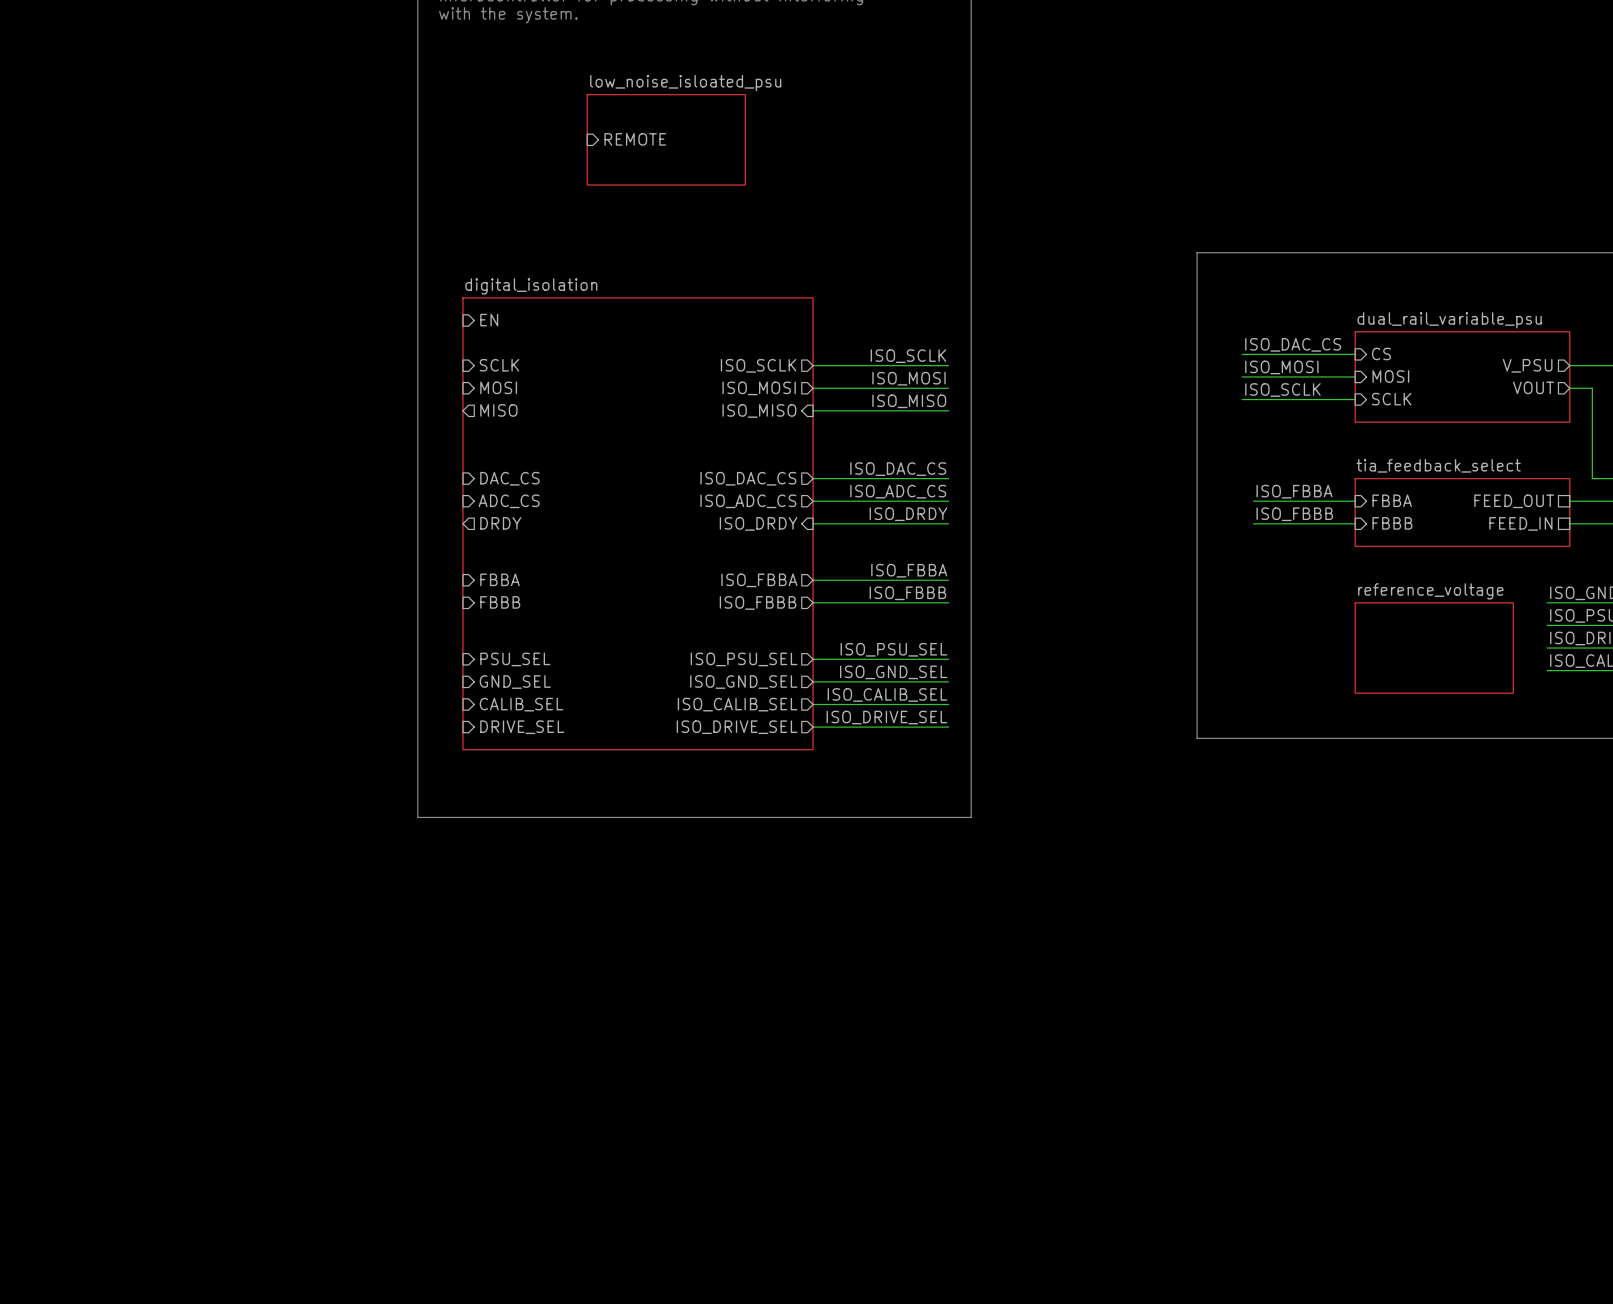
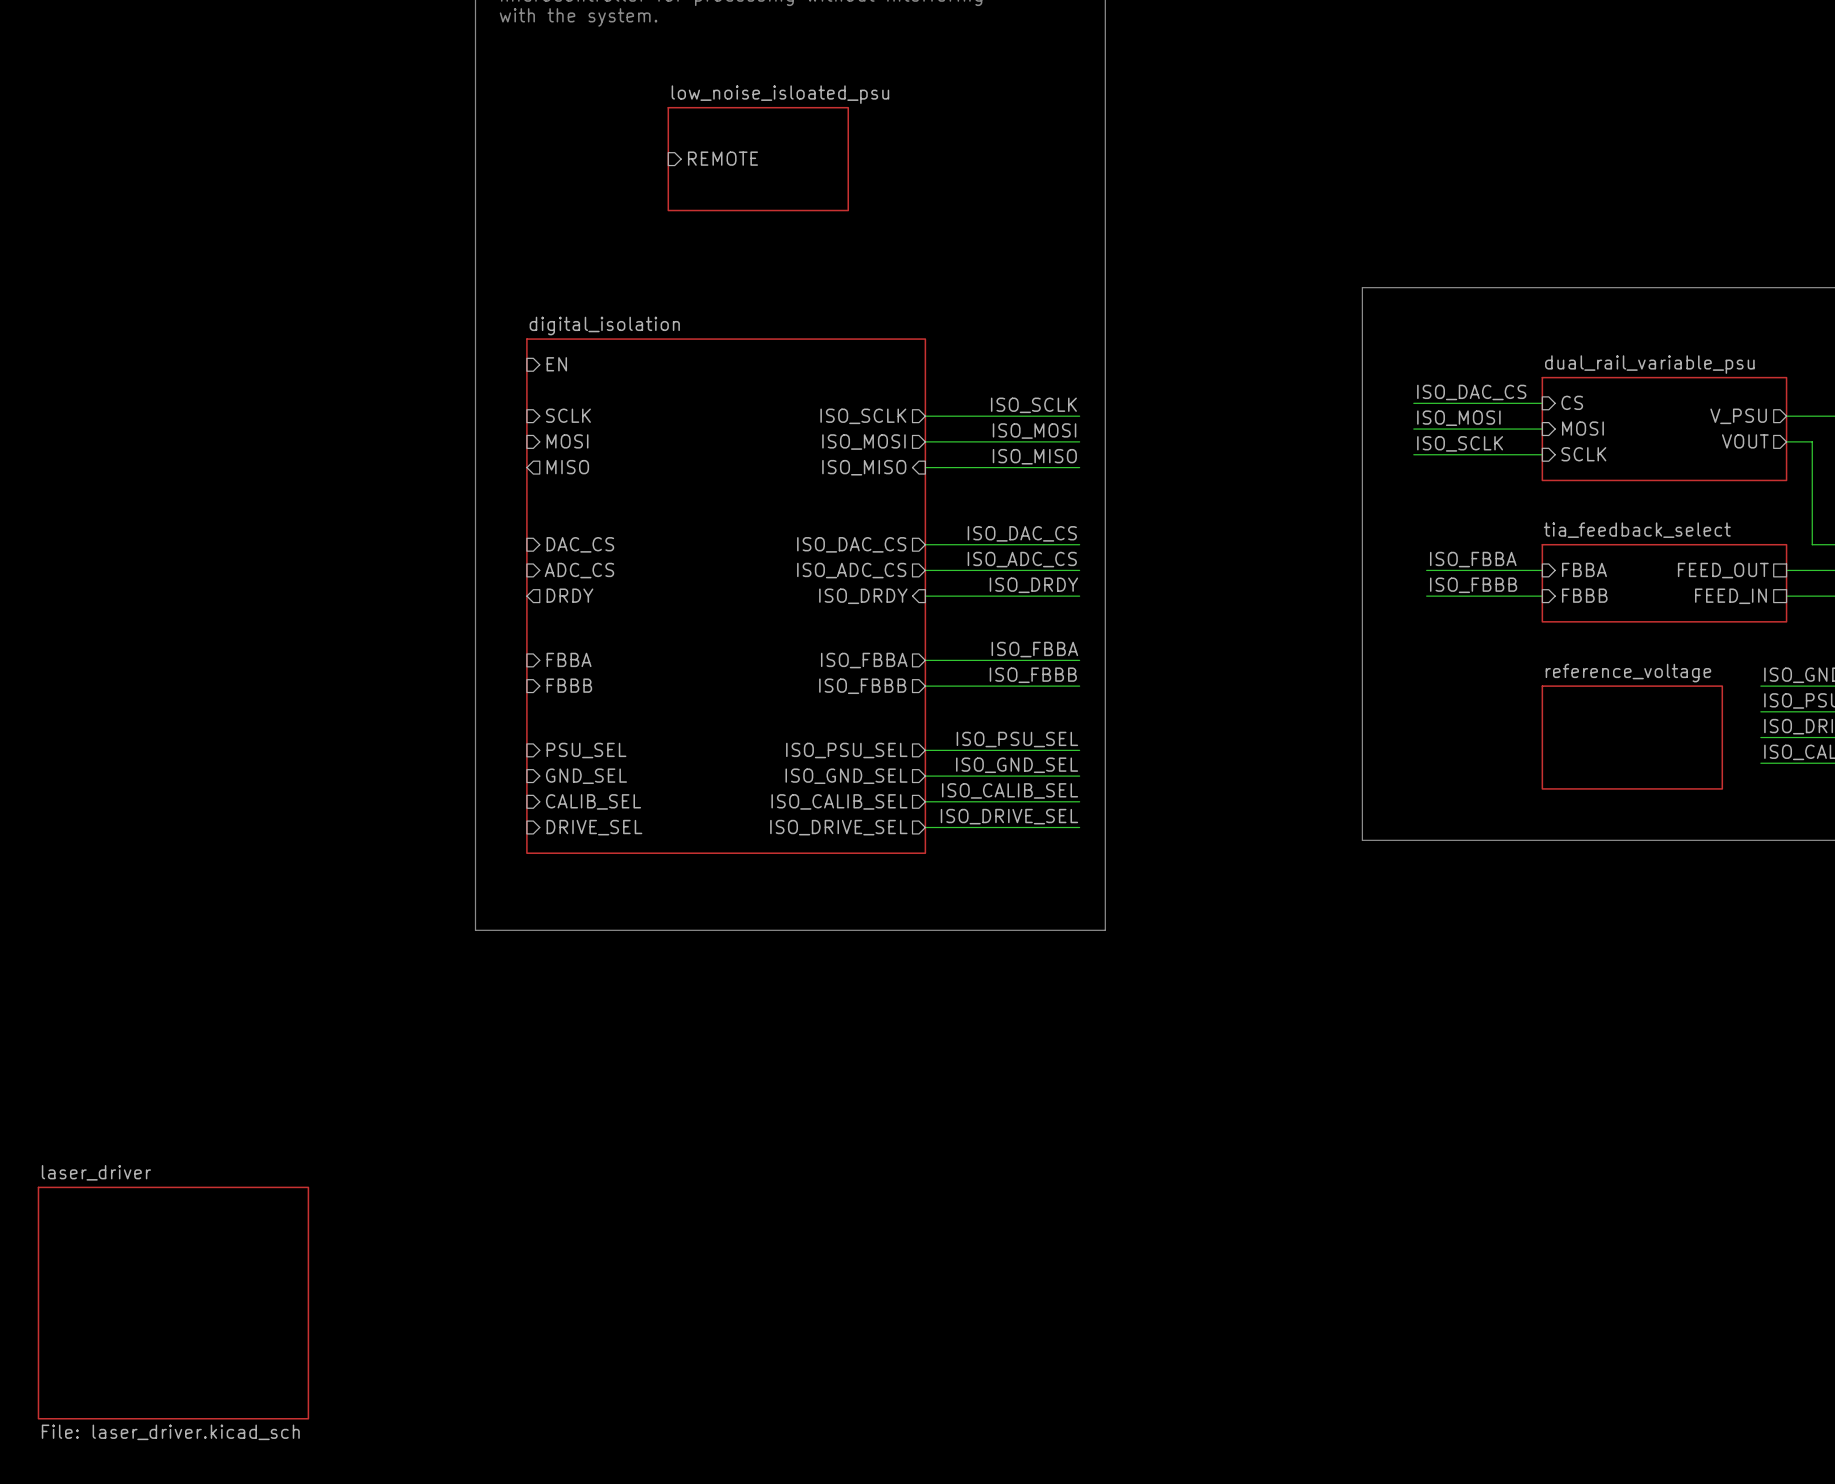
sheet laser_driver: none -> File: laser_driver.kicad_sch (173, 1303)

